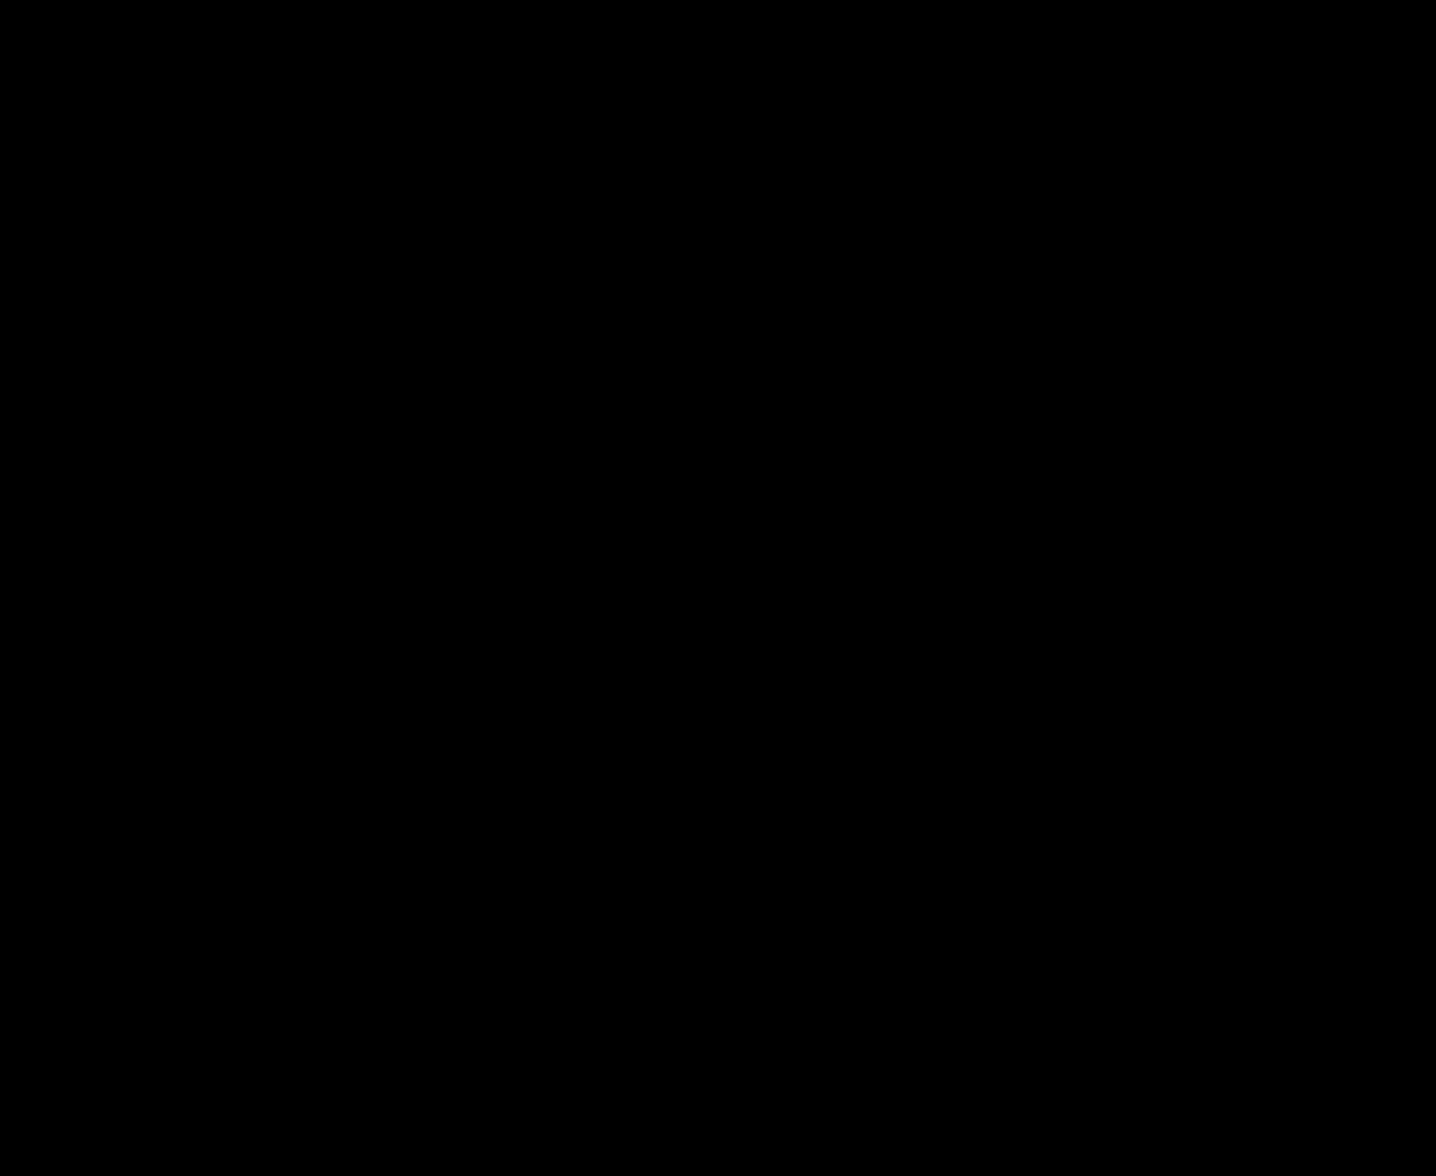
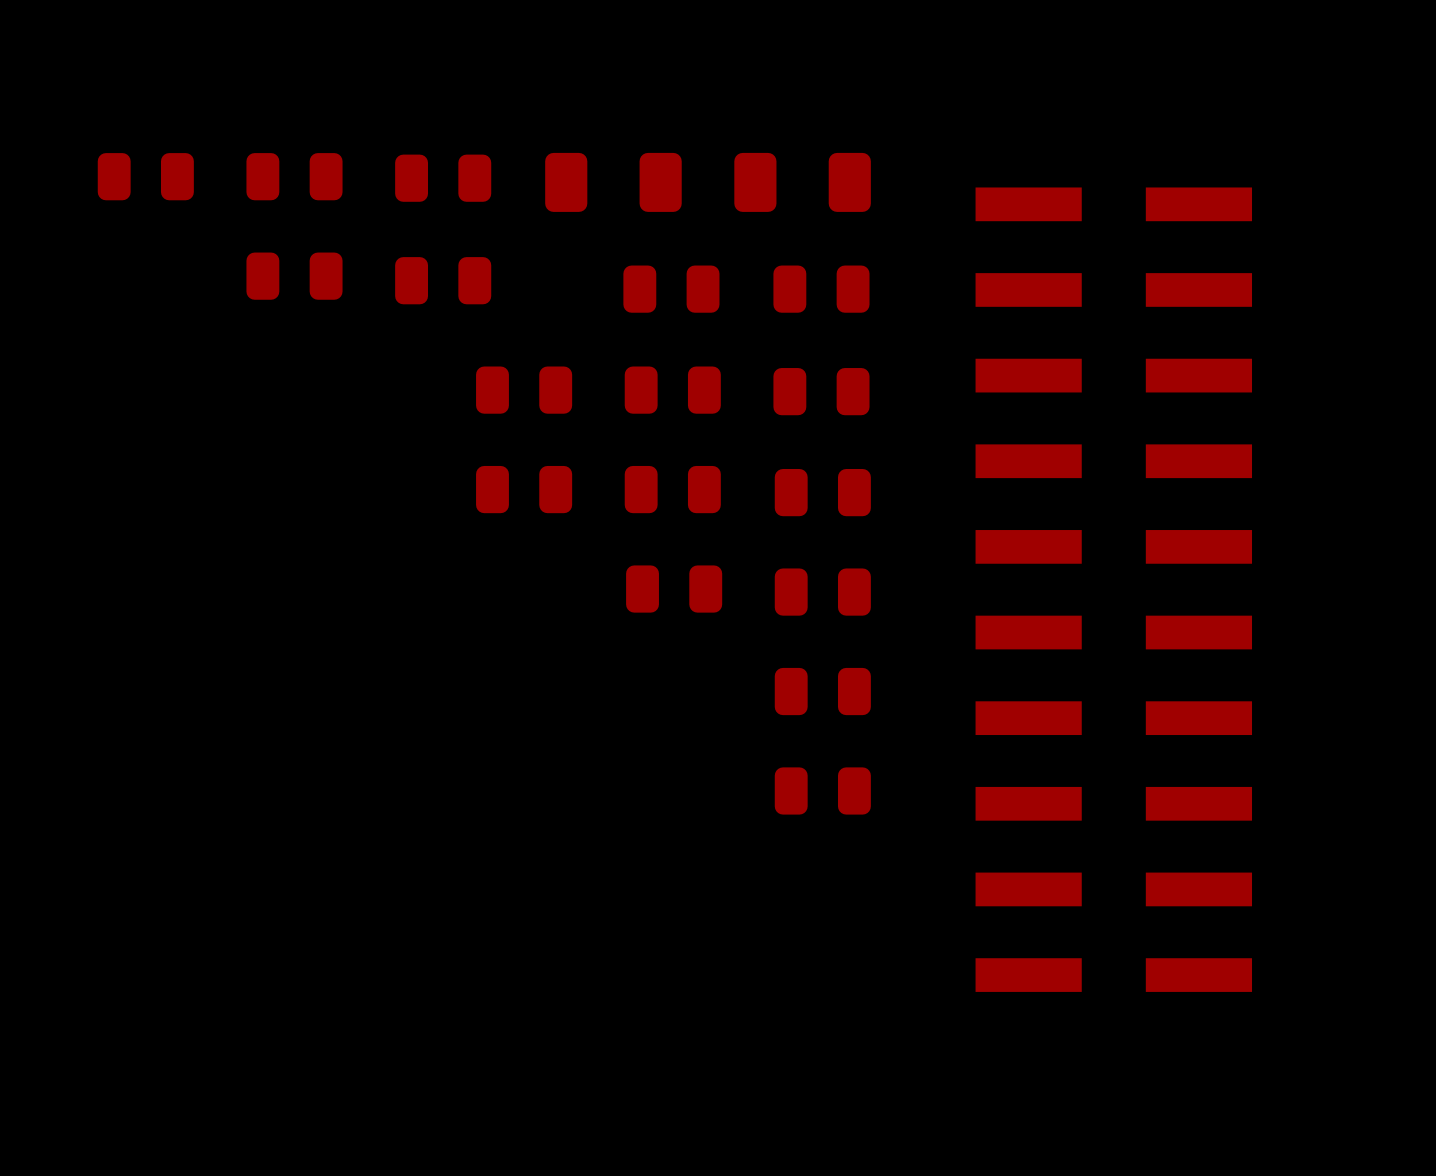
part: none -> (145, 176)
part: none -> (294, 176)
part: none -> (443, 178)
part: none -> (613, 182)
part: none -> (802, 182)
part: none -> (294, 276)
part: none -> (443, 280)
part: none -> (671, 289)
part: none -> (821, 289)
part: none -> (524, 390)
part: none -> (672, 390)
part: none -> (821, 391)
part: none -> (524, 489)
part: none -> (672, 489)
part: none -> (822, 492)
part: none -> (674, 589)
part: none -> (1113, 589)
part: none -> (822, 592)
part: none -> (822, 691)
part: none -> (822, 790)

